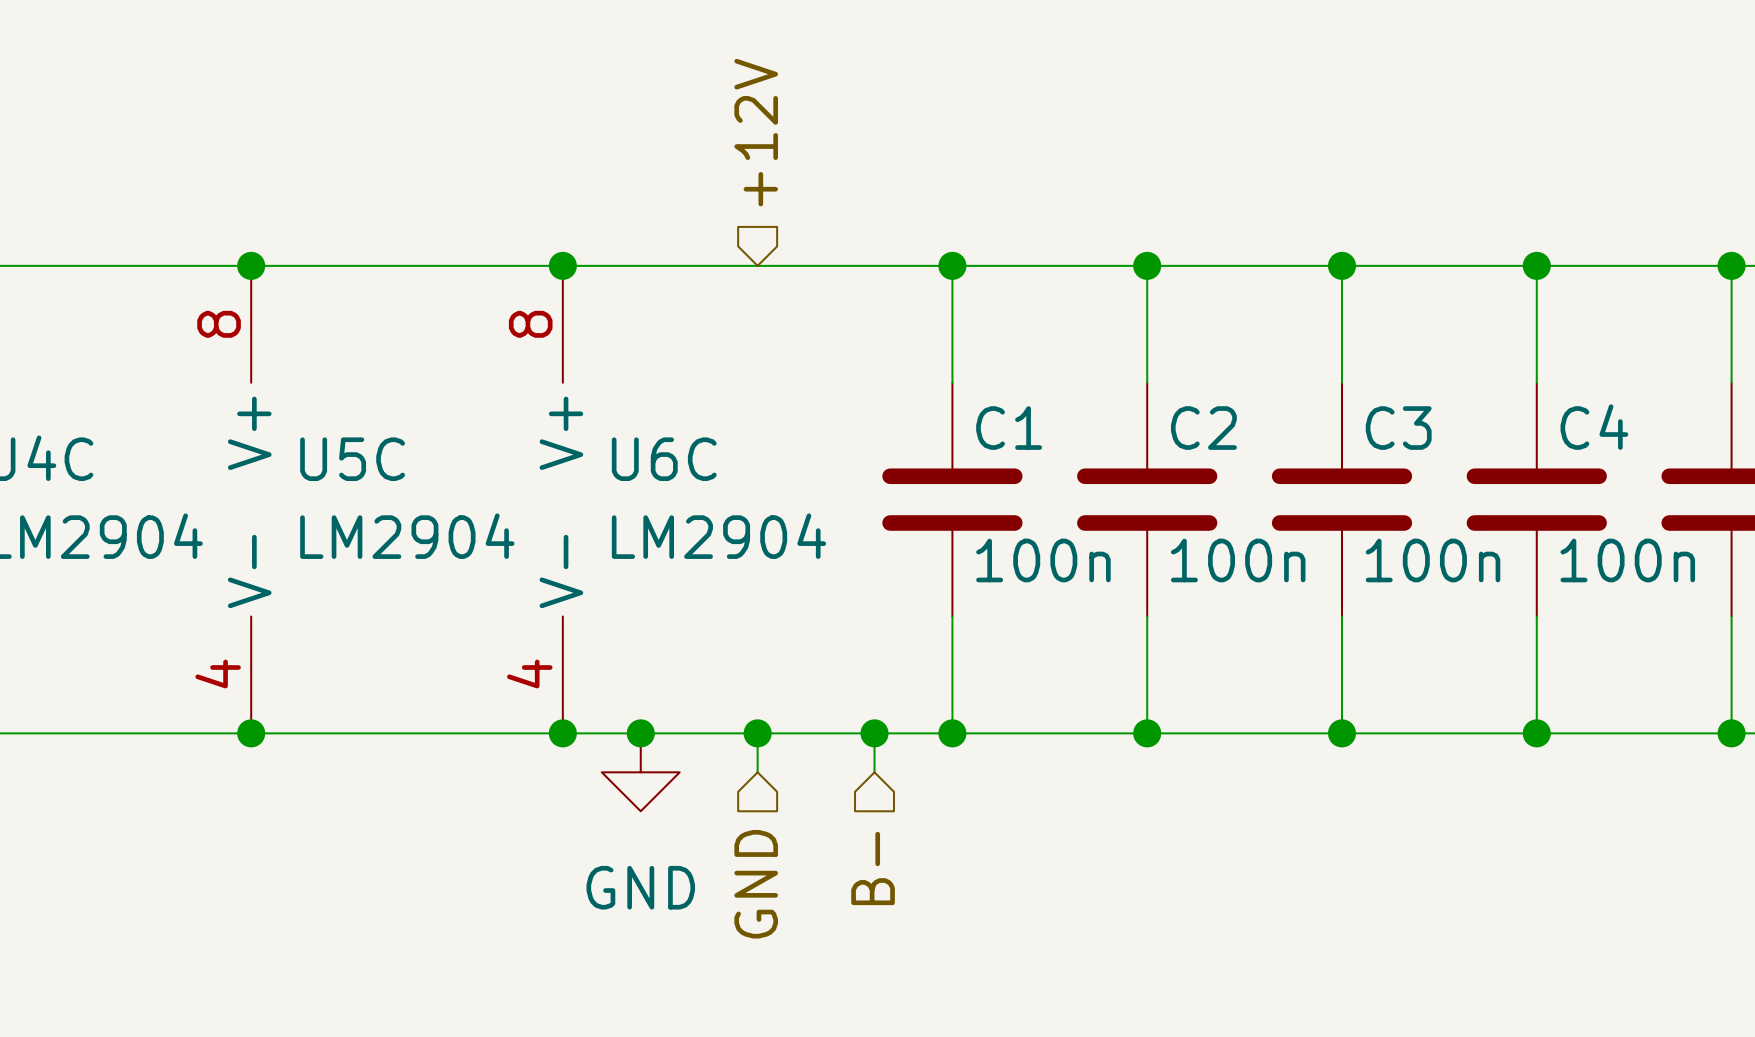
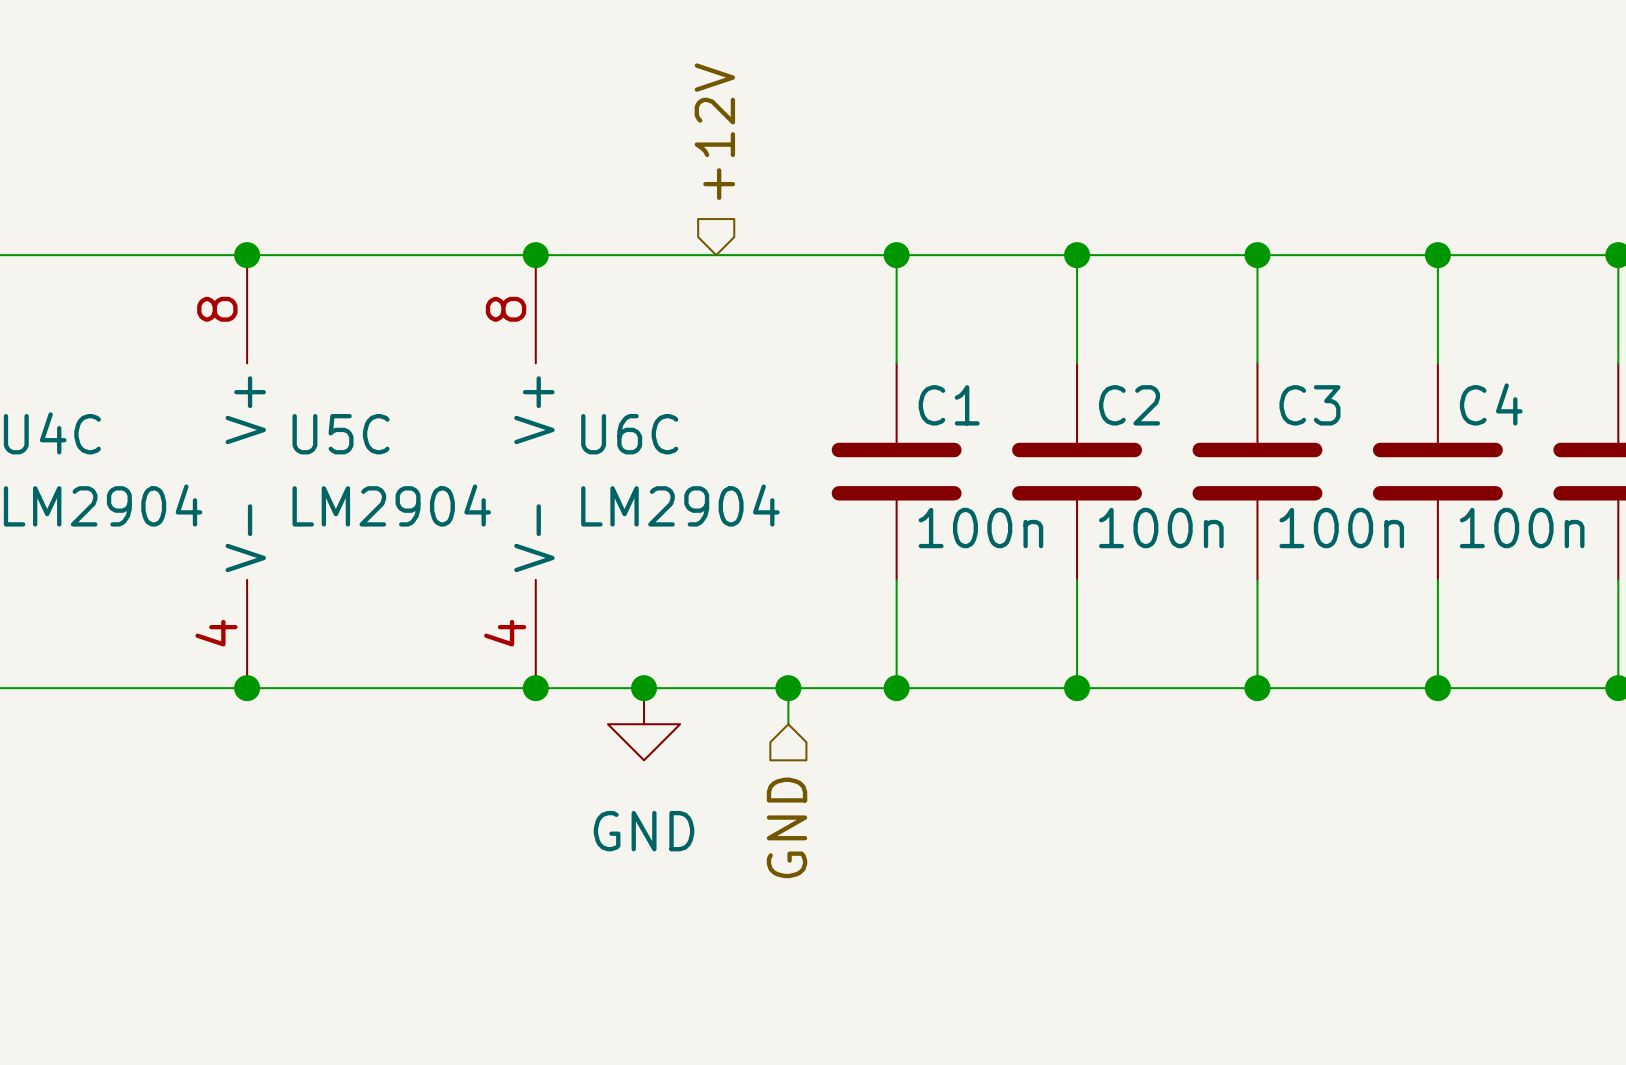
junction: (640, 733) -> none
junction: none -> (644, 688)
wire: (757, 733) (757, 772) -> none
junction: (757, 733) -> none
junction: none -> (788, 688)
wire: (874, 733) (874, 772) -> (788, 688) (788, 724)
junction: (874, 733) -> none
power symbol position: GND (640, 772) -> GND (644, 724)
hierarchical label: B- (873, 868) -> none
hierarchical label position: GND (756, 884) -> GND (787, 827)

